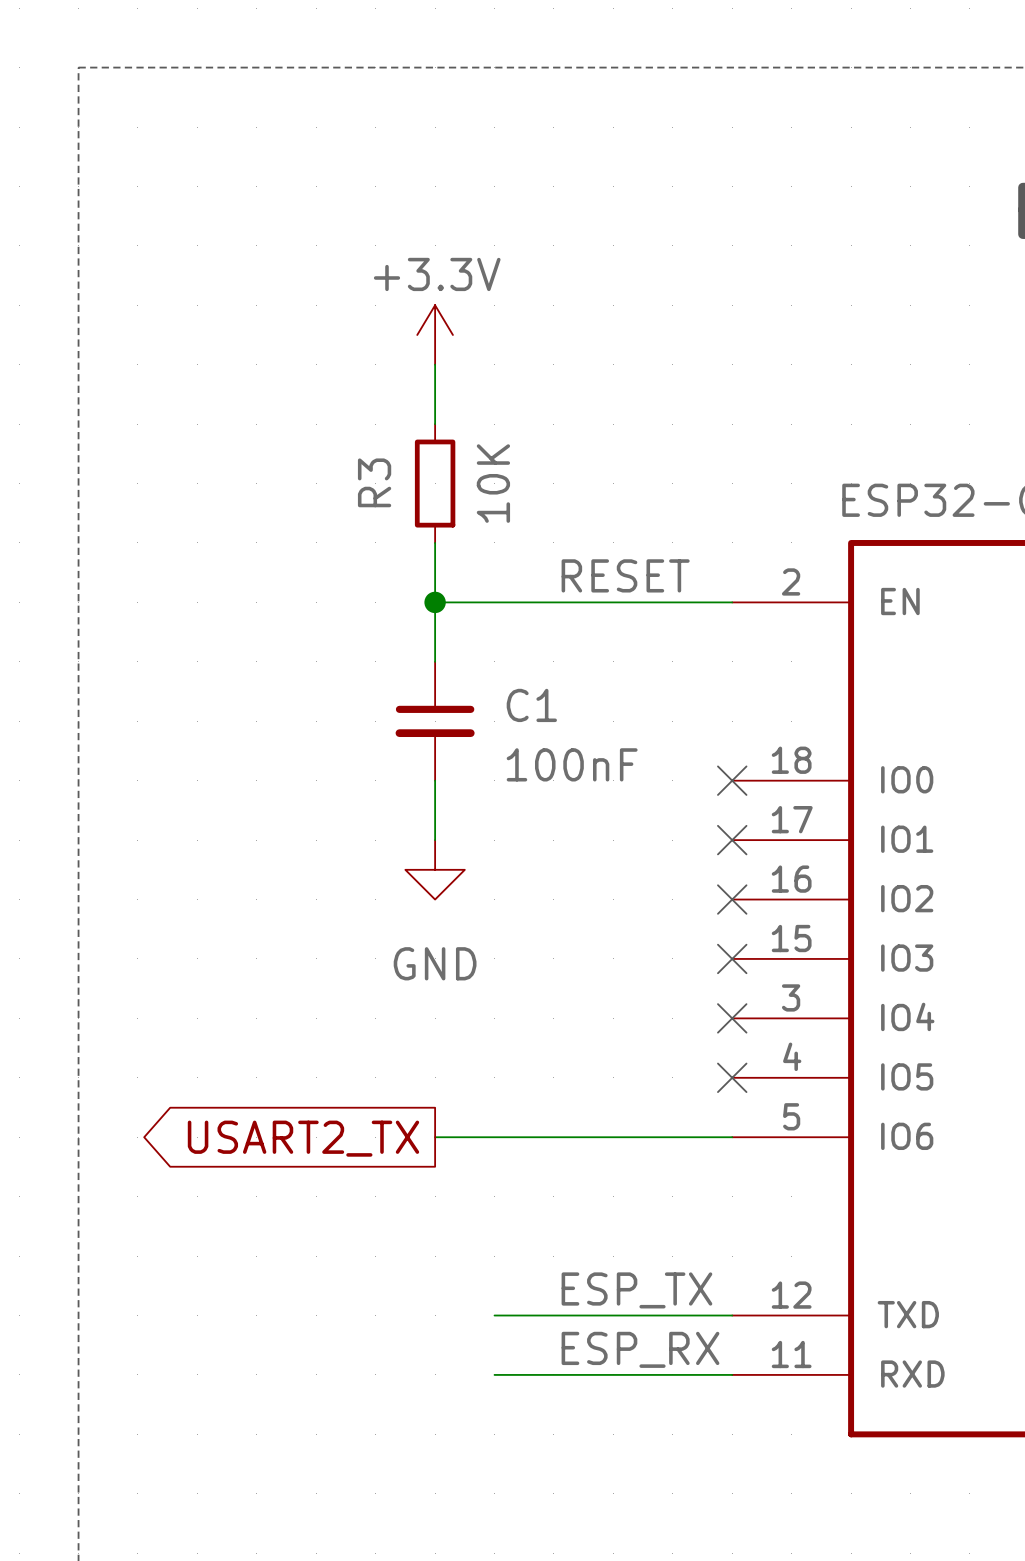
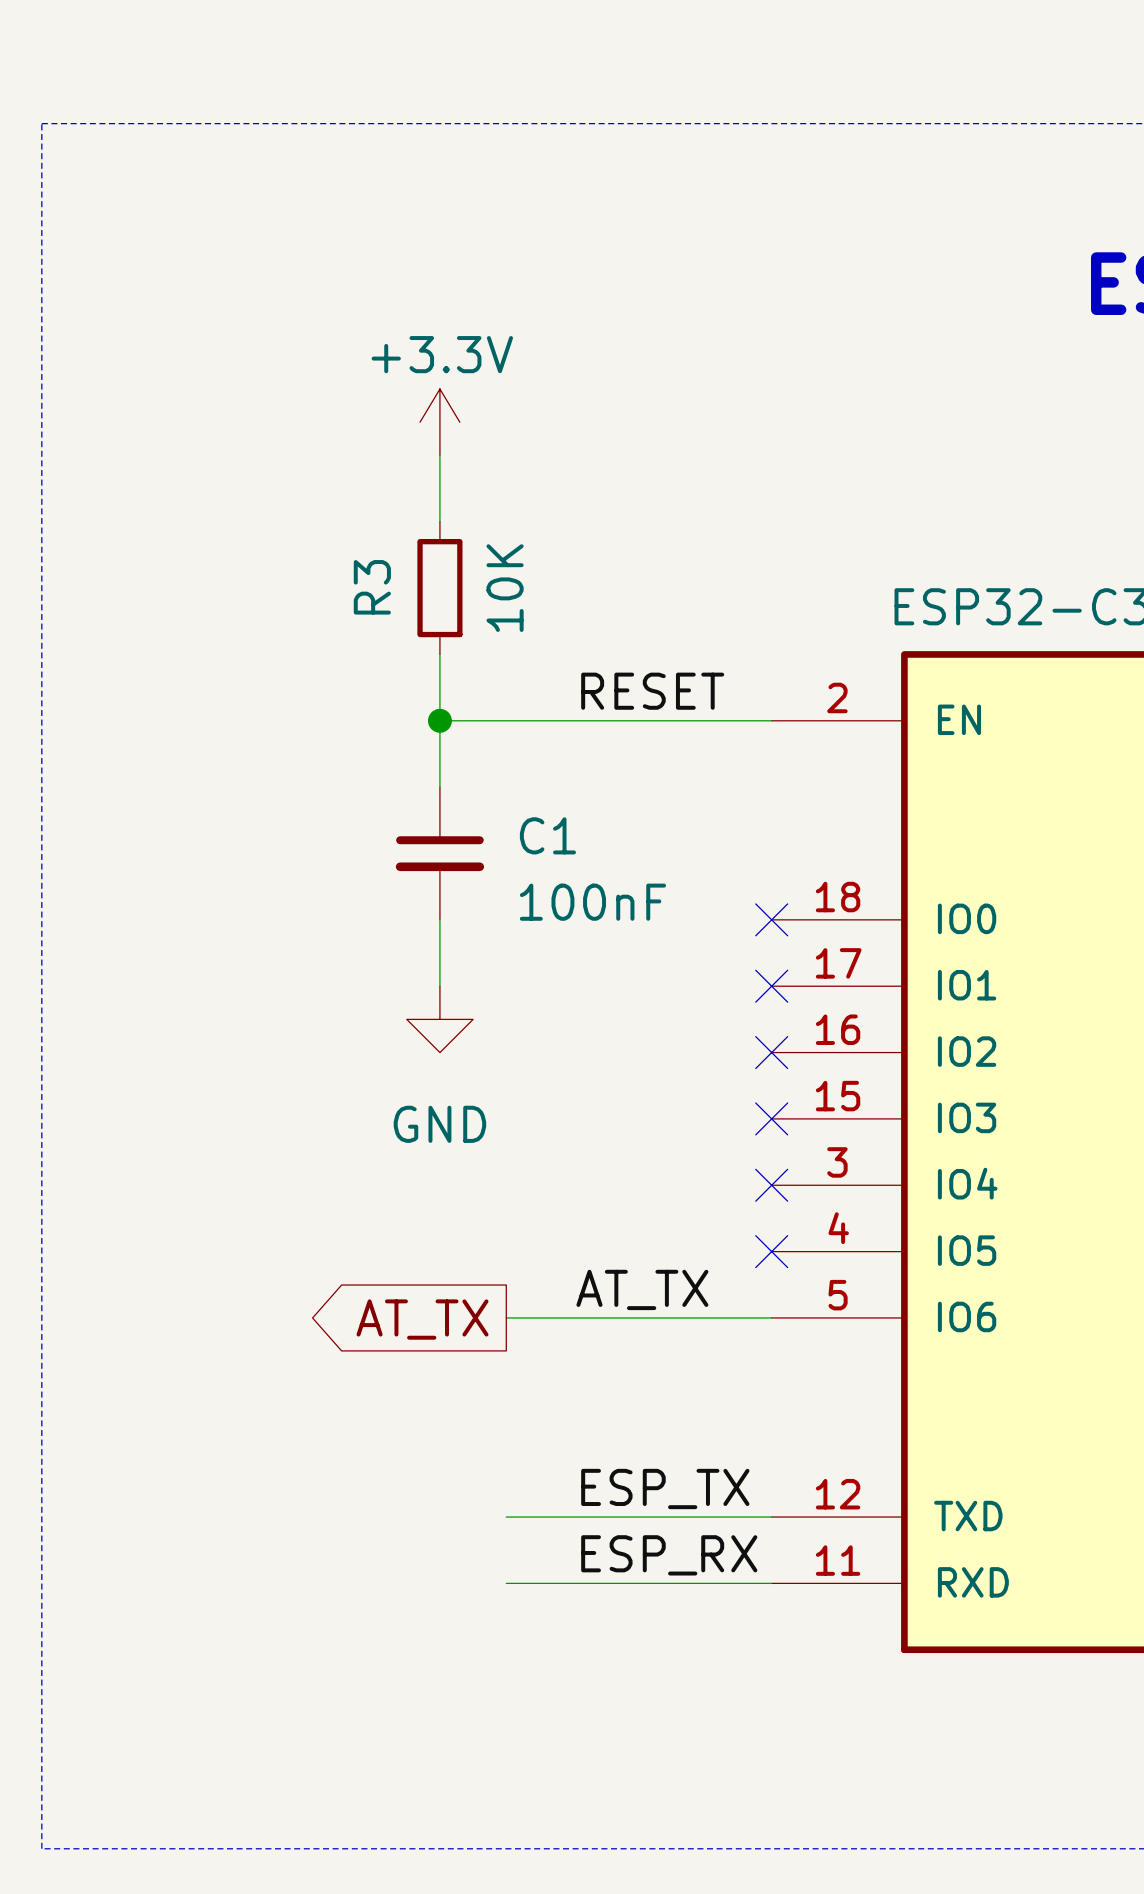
label: none -> AT_TX (642, 1289)
wire: (435, 1137) (494, 1137) -> none
global label: USART2_TX (303, 1138) -> AT_TX (422, 1319)

